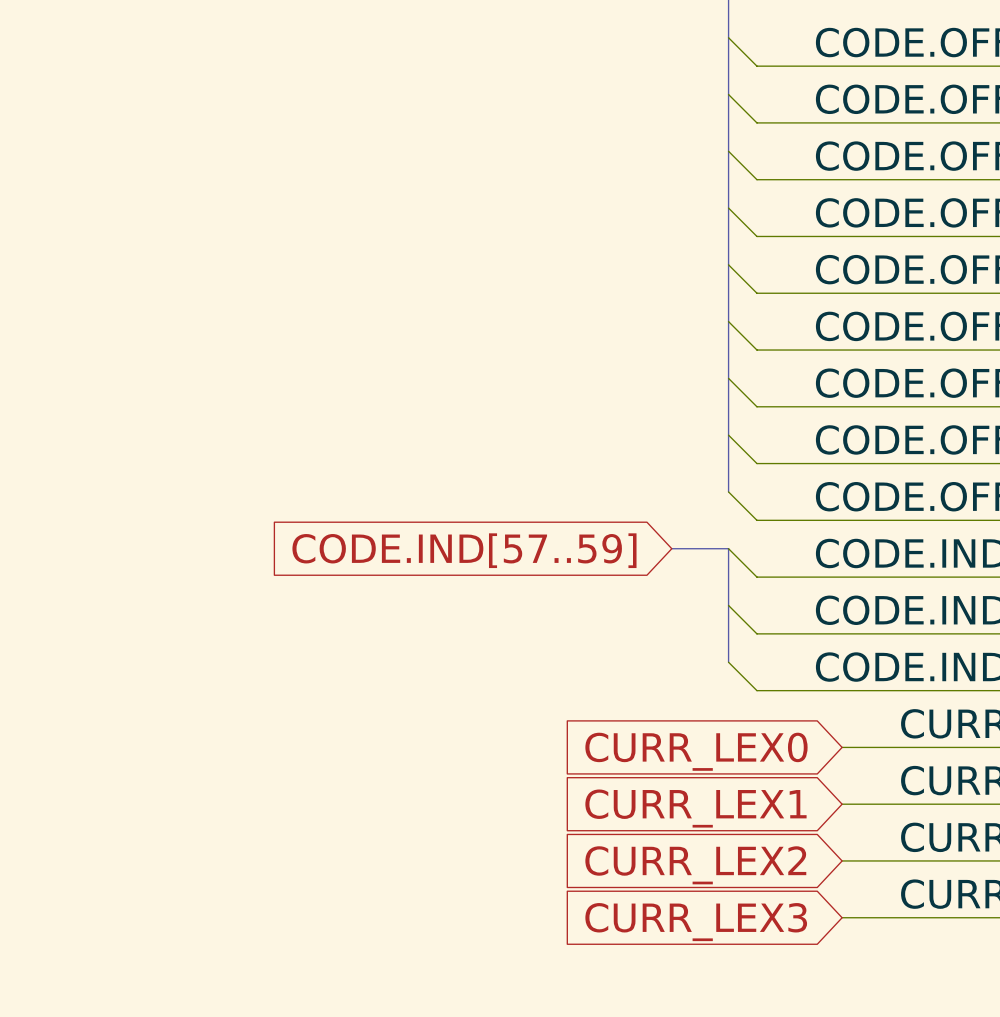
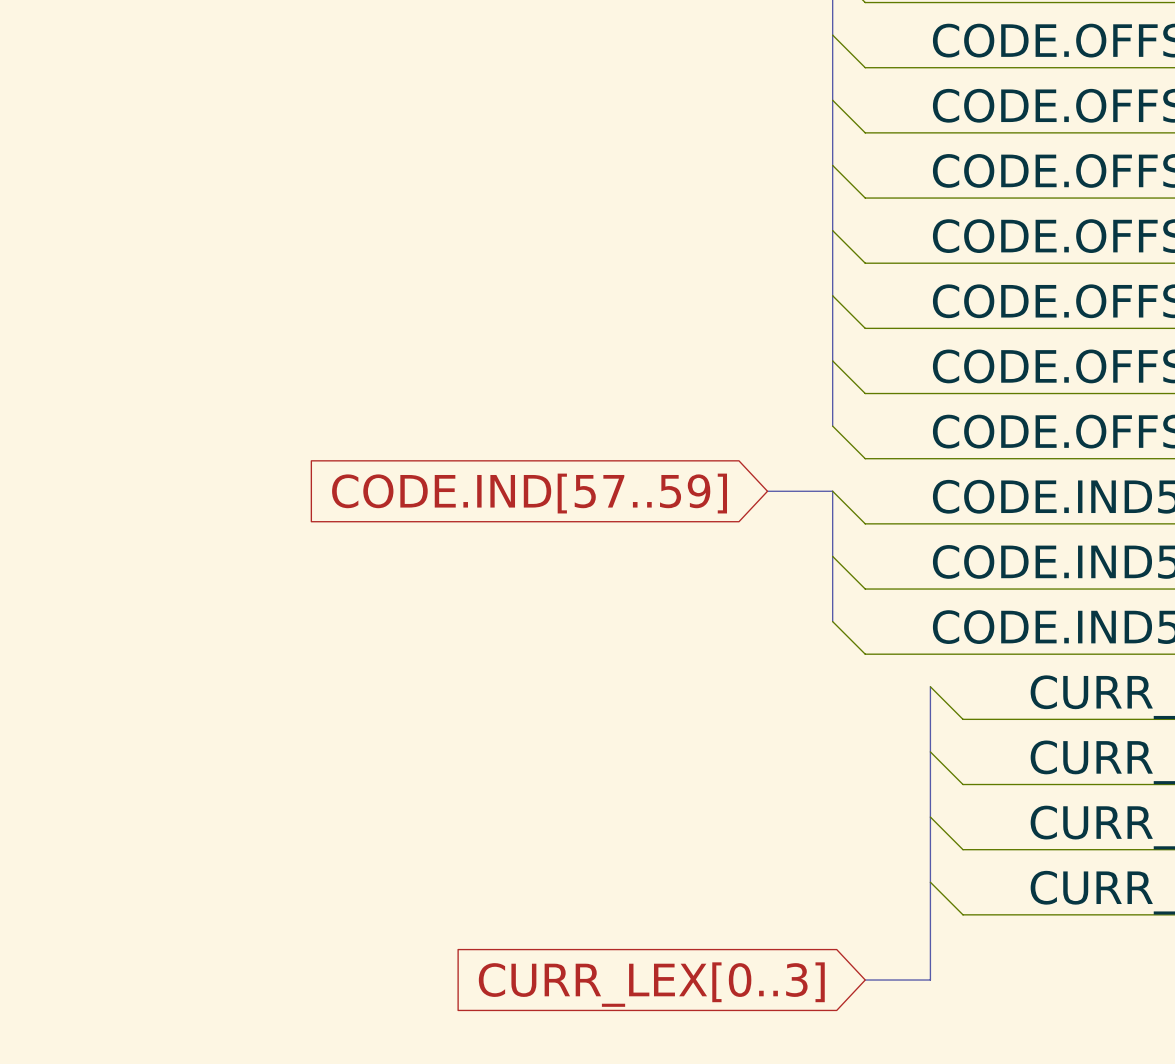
wire: none -> (930, 686) (962, 719)
bus: none -> (930, 686) (930, 980) (865, 980)
global label: CURR_LEX0 (696, 751) -> none
wire: none -> (930, 751) (962, 784)
global label: CURR_LEX1 (695, 808) -> none
wire: none -> (930, 817) (962, 849)
global label: CURR_LEX2 (695, 865) -> none
wire: none -> (930, 882) (962, 914)
global label: CURR_LEX3 (696, 922) -> CURR_LEX[0..3] (651, 984)

